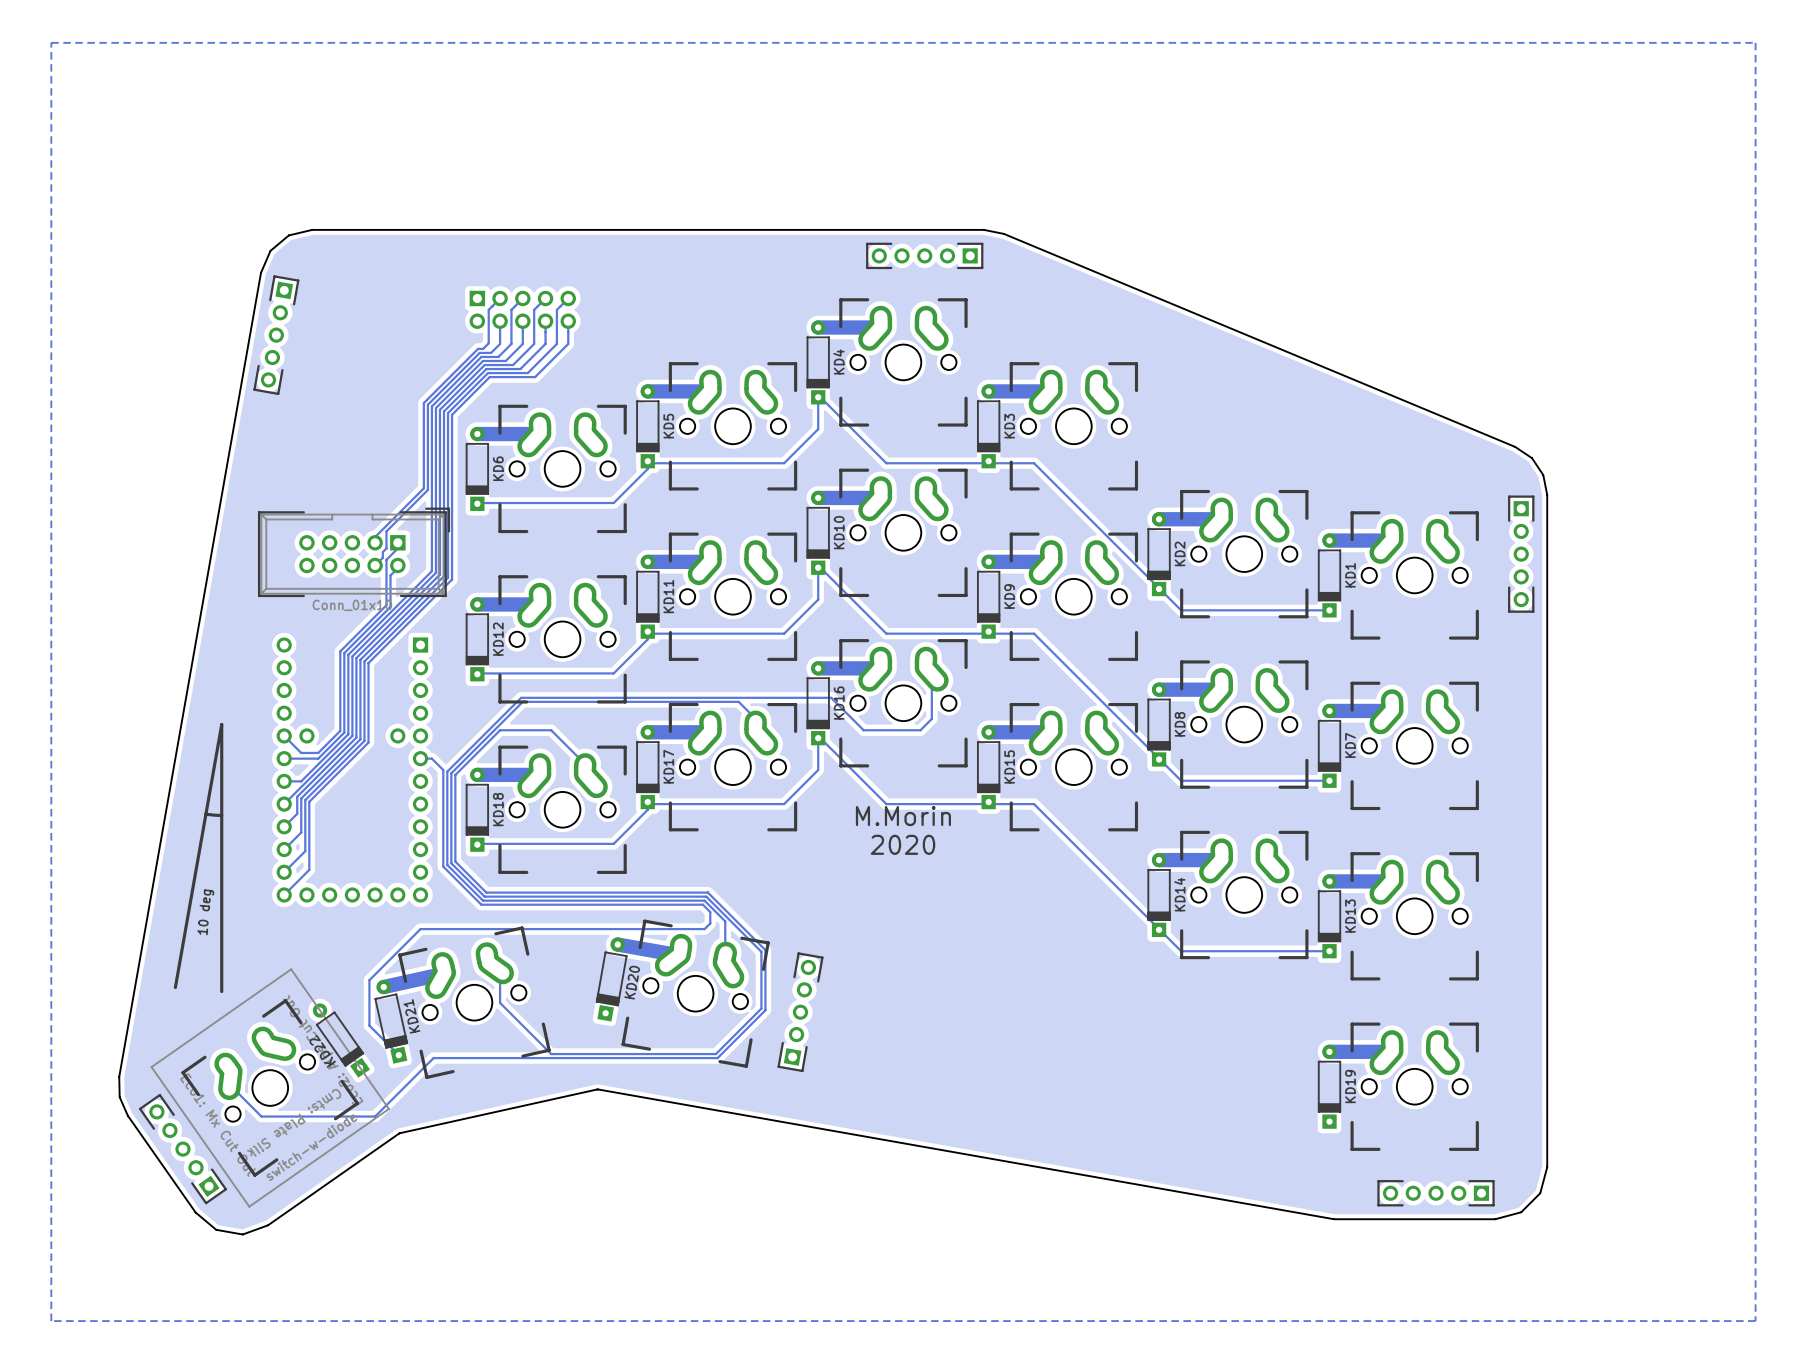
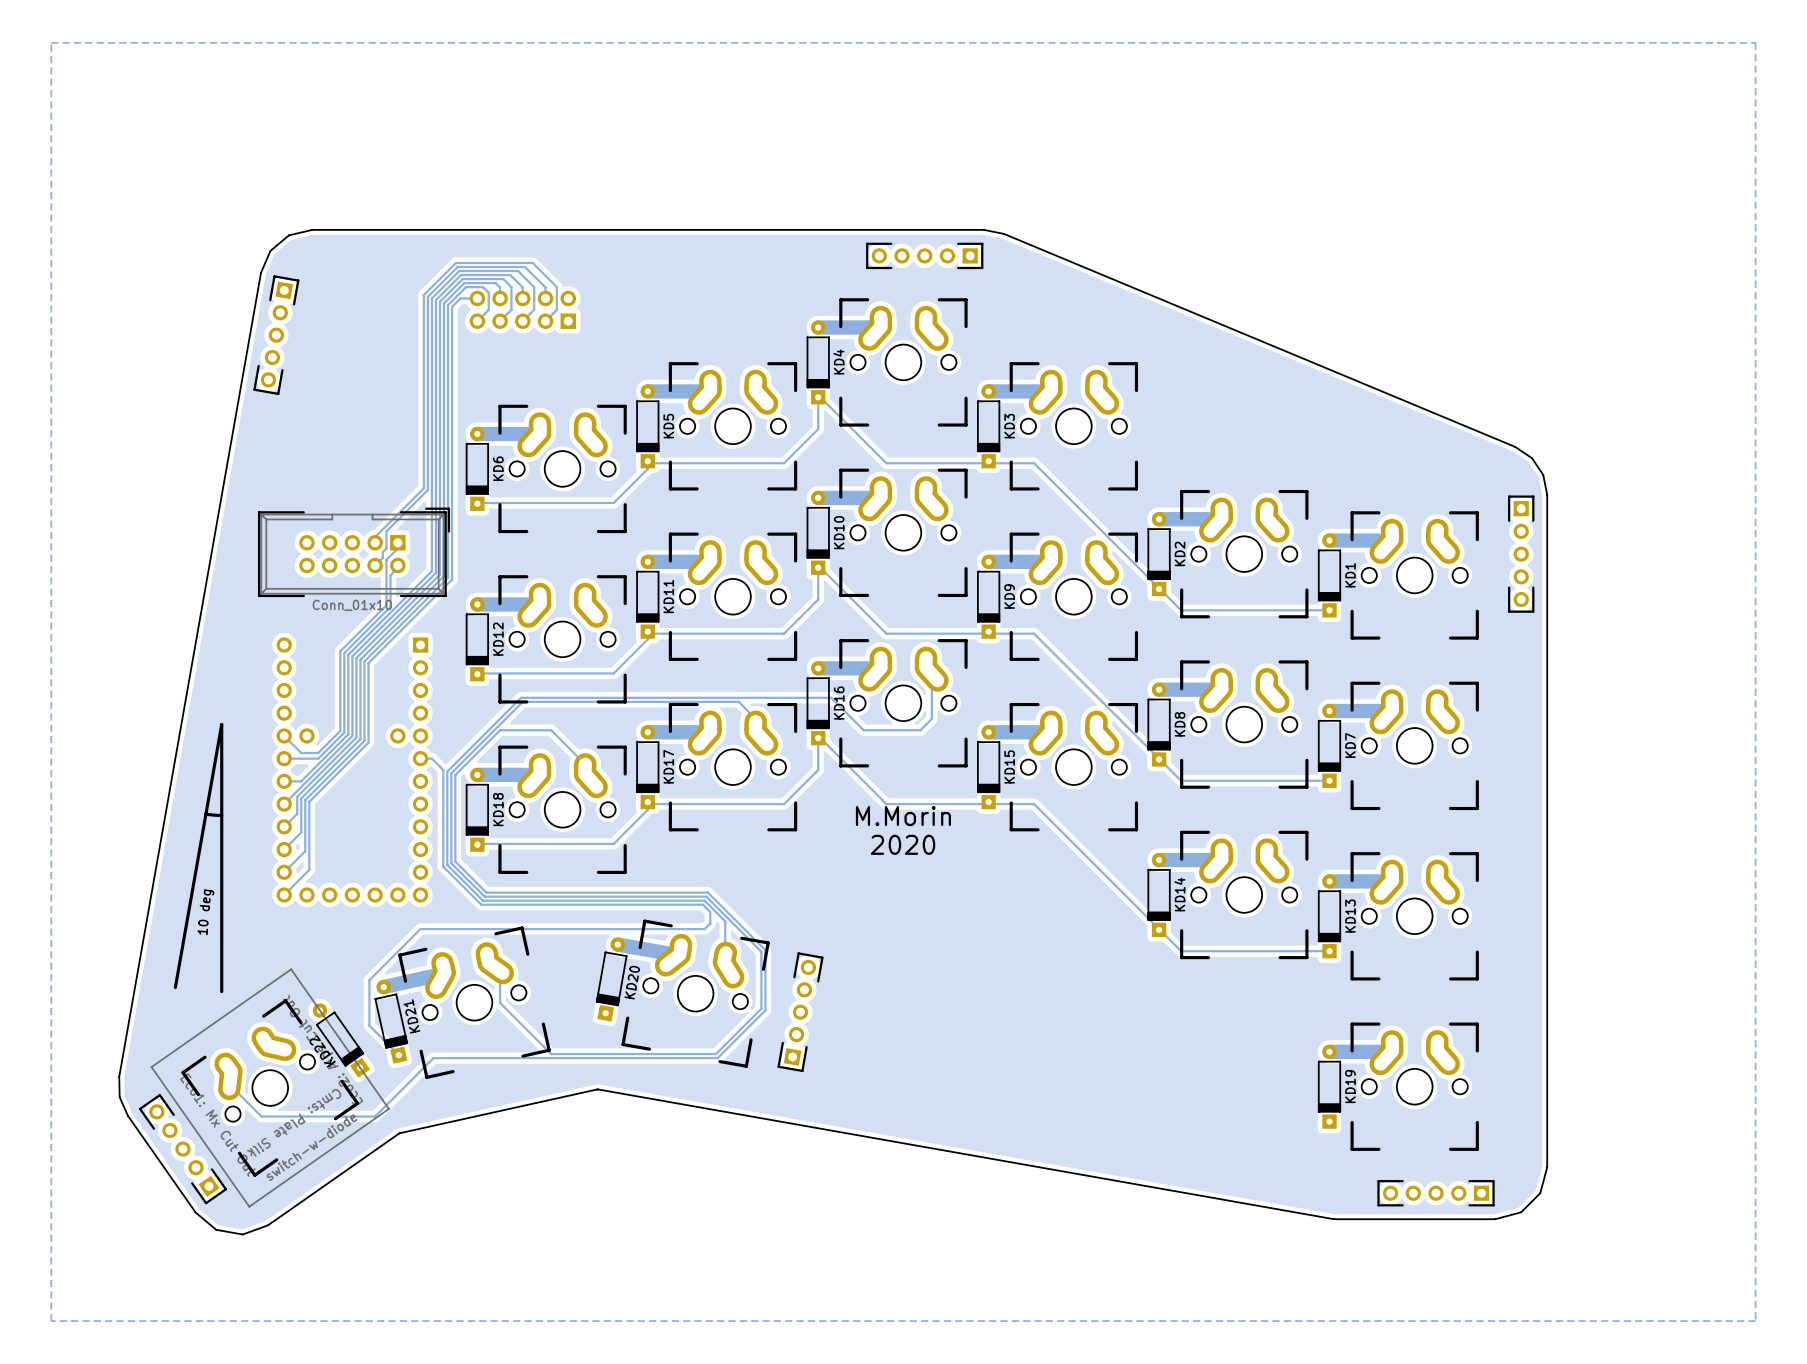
track: none -> (423, 295) (423, 403)
track: (500, 298) (488, 309) (488, 343) (483, 348) (478, 348) (423, 403) -> (500, 298) (500, 287) (495, 283) (464, 283) (444, 303) (444, 411)
track: (522, 298) (511, 309) (511, 343) (498, 356) (481, 356) (431, 406) -> (522, 298) (522, 287) (510, 275) (461, 275) (435, 300) (435, 408)
track: (545, 298) (534, 309) (534, 343) (513, 365) (484, 365) (439, 409) -> (545, 298) (545, 287) (524, 267) (457, 267) (427, 296) (427, 404)
track: (568, 298) (556, 309) (556, 343) (527, 373) (488, 373) (448, 413) -> (477, 321) (488, 309) (488, 292) (483, 287) (466, 287) (448, 305) (448, 413)
part rotation: 0° (522, 309) -> 180° (522, 309)
track: (500, 321) (500, 343) (491, 352) (479, 352) (427, 404) -> (500, 321) (511, 309) (511, 287) (503, 279) (462, 279) (439, 301) (439, 409)
track: (522, 321) (522, 343) (505, 360) (483, 360) (435, 408) -> (522, 321) (534, 309) (534, 287) (518, 271) (459, 271) (431, 298) (431, 406)
track: (545, 321) (545, 343) (520, 369) (486, 369) (444, 411) -> (545, 321) (556, 309) (556, 287) (532, 262) (456, 262) (423, 295)
track: (568, 321) (568, 343) (535, 377) (489, 377) (452, 414) -> (477, 298) (460, 298) (452, 306) (452, 414)

